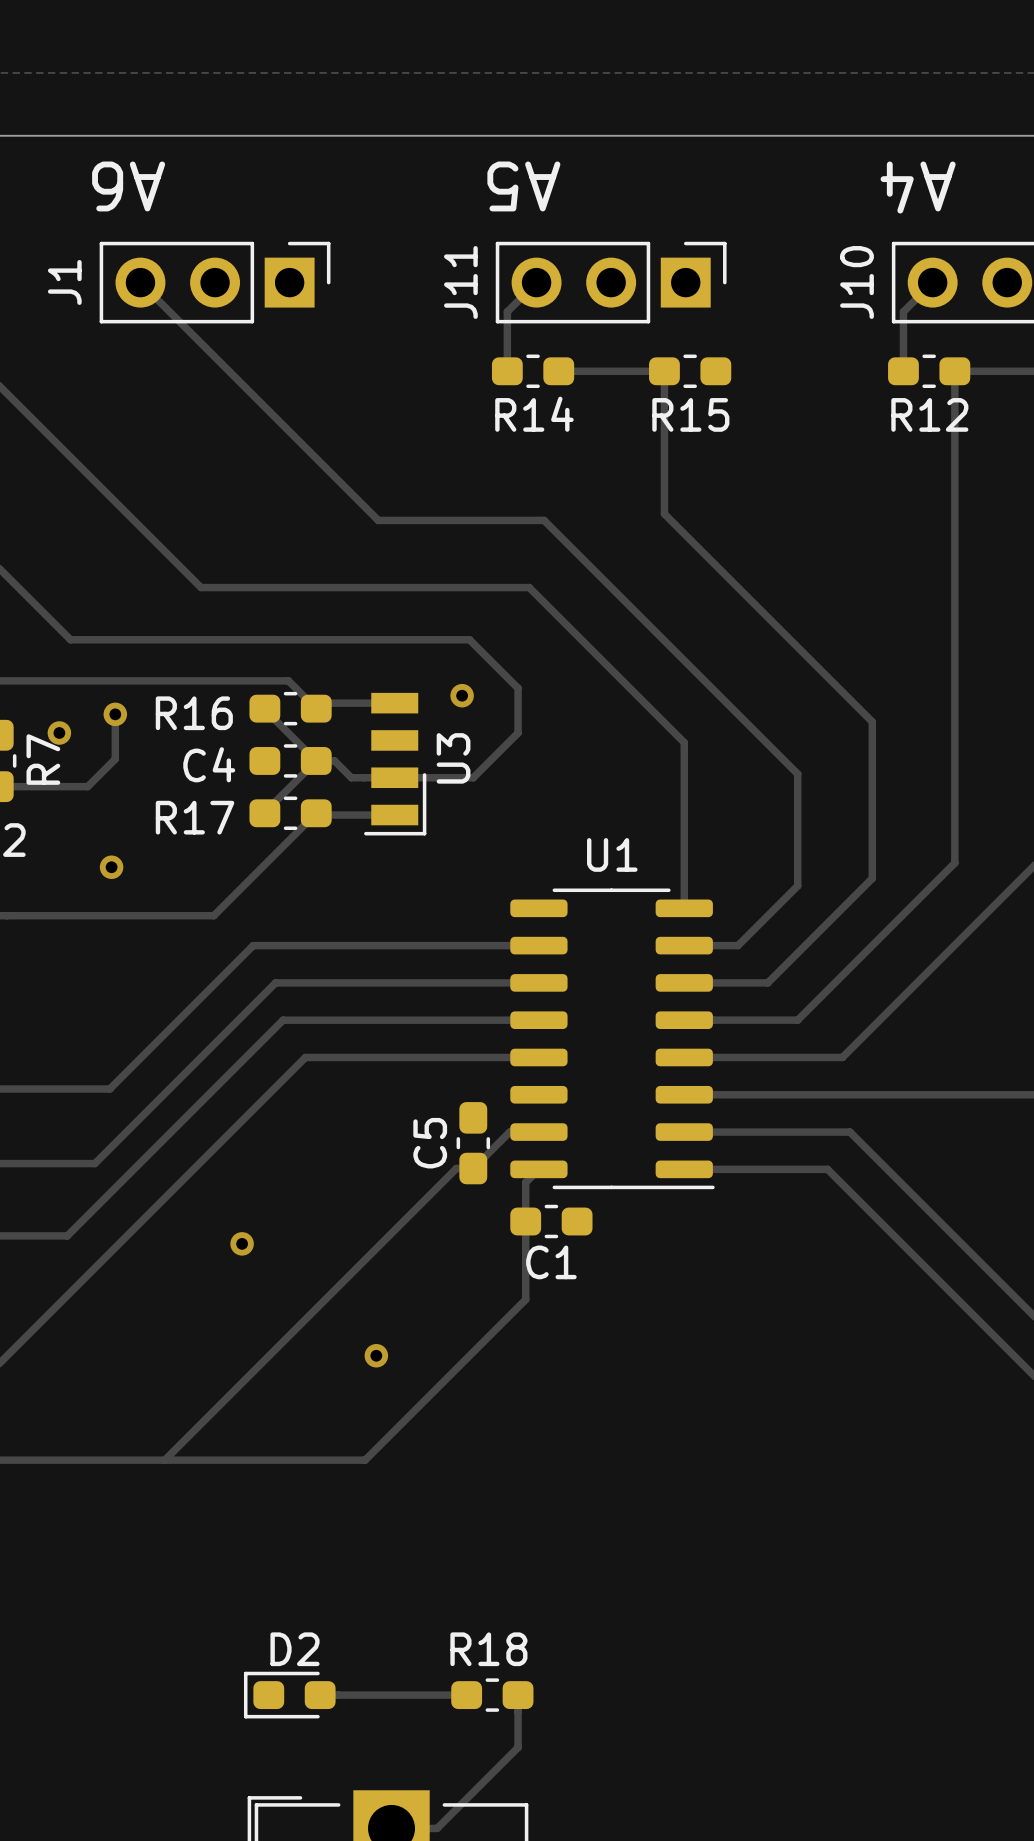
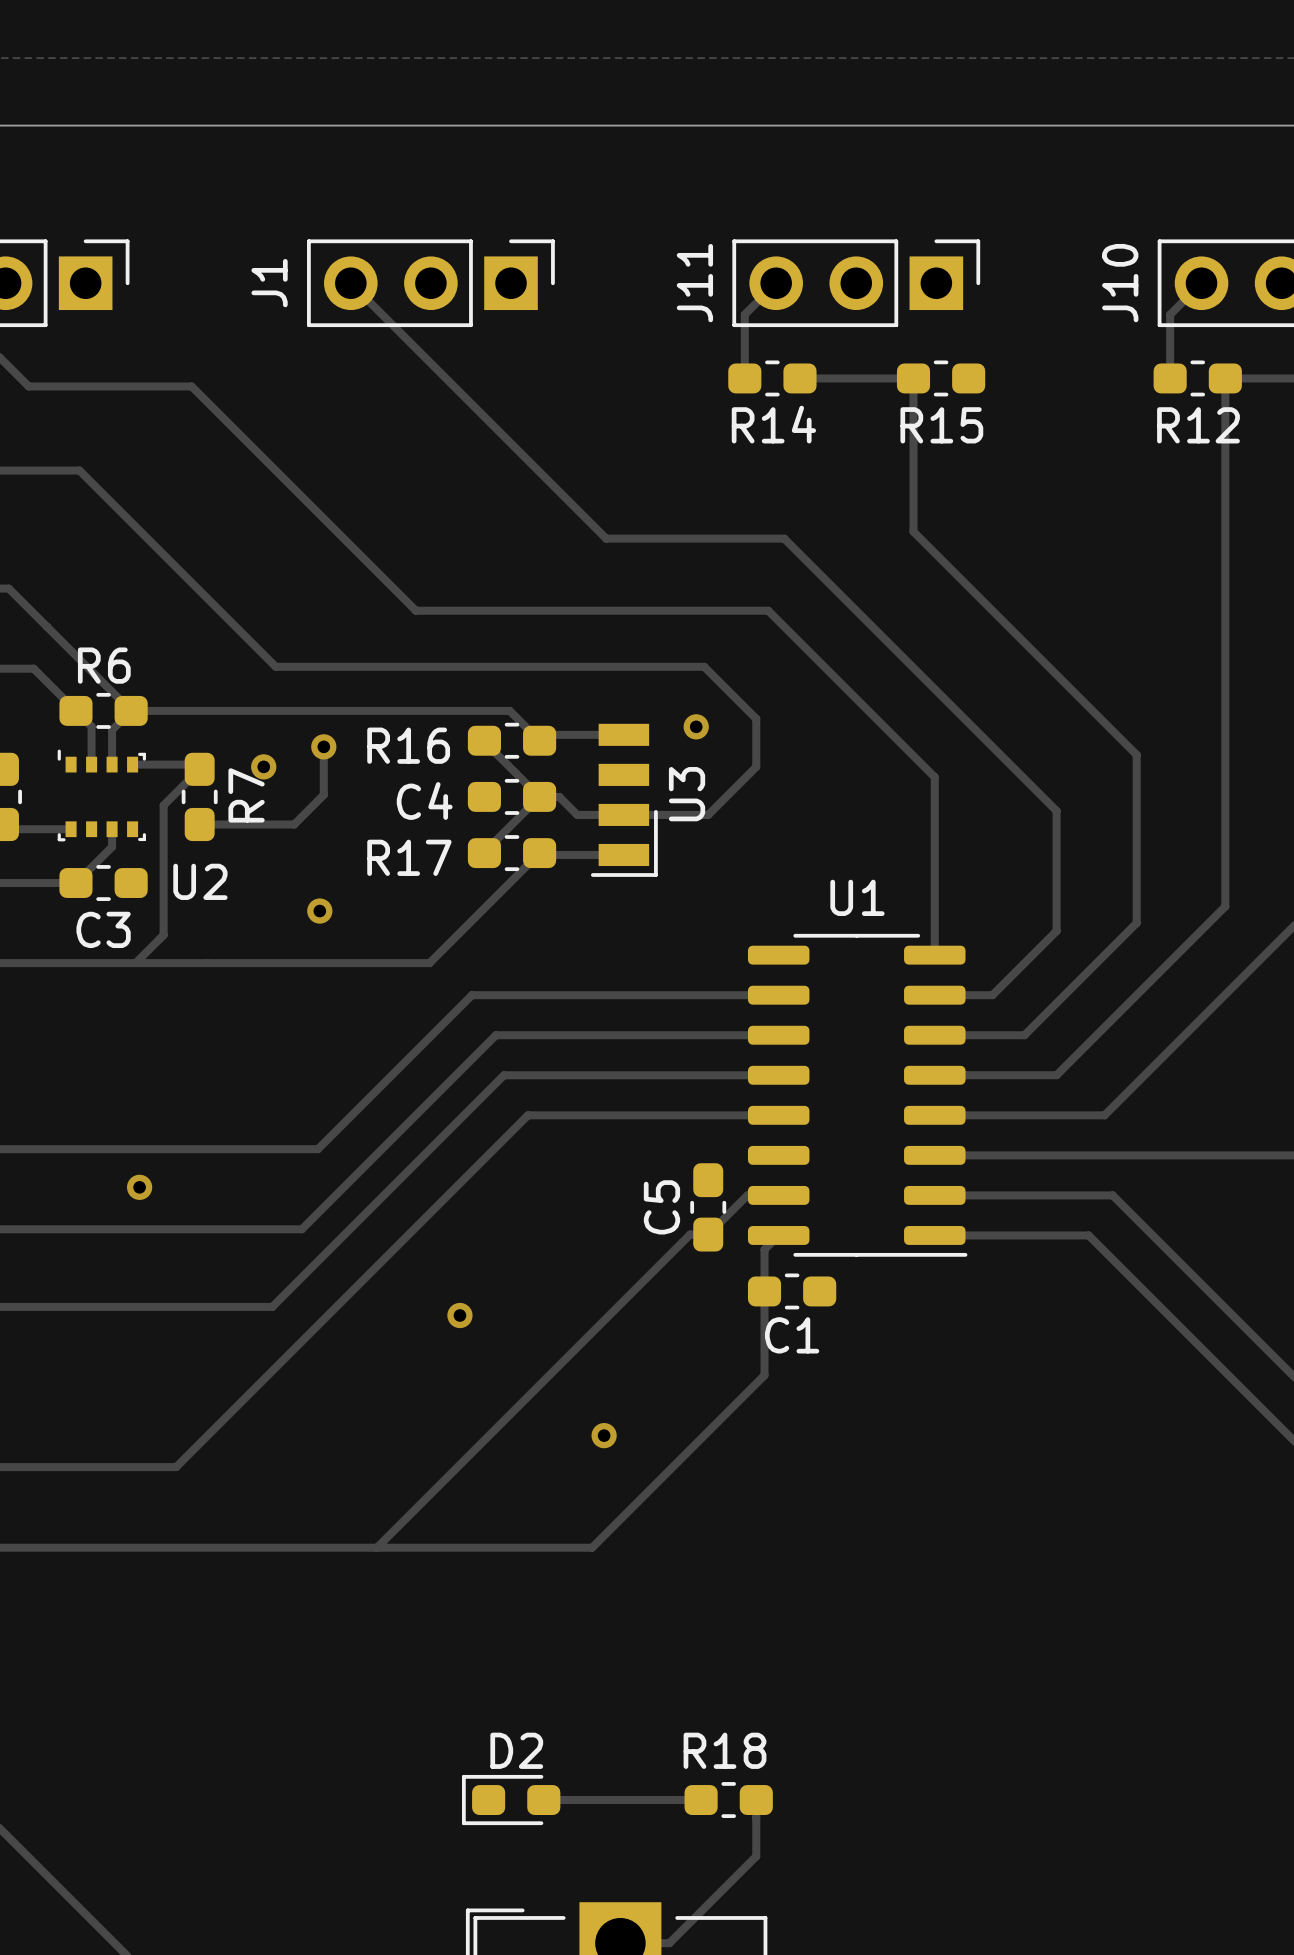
text: A6 (128, 186) -> none
text: A5 (523, 186) -> none
text: A4 (918, 187) -> none

